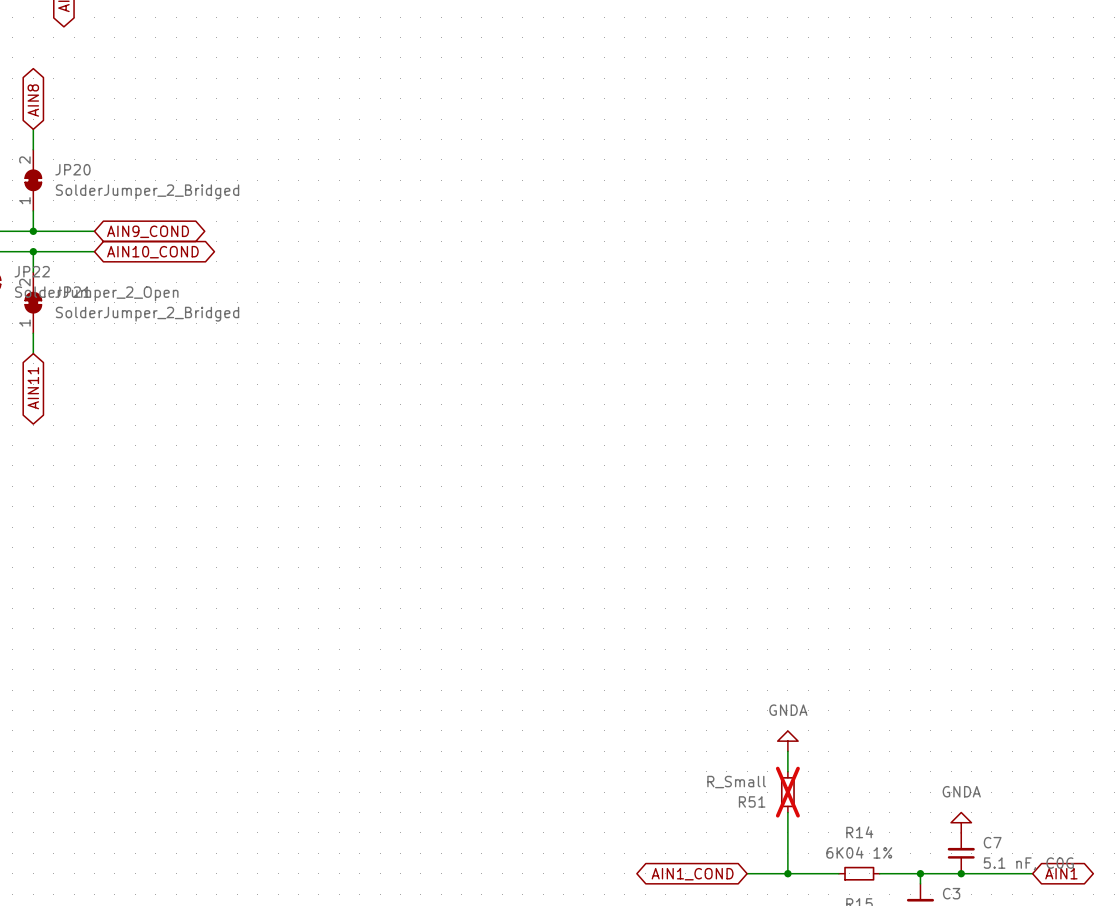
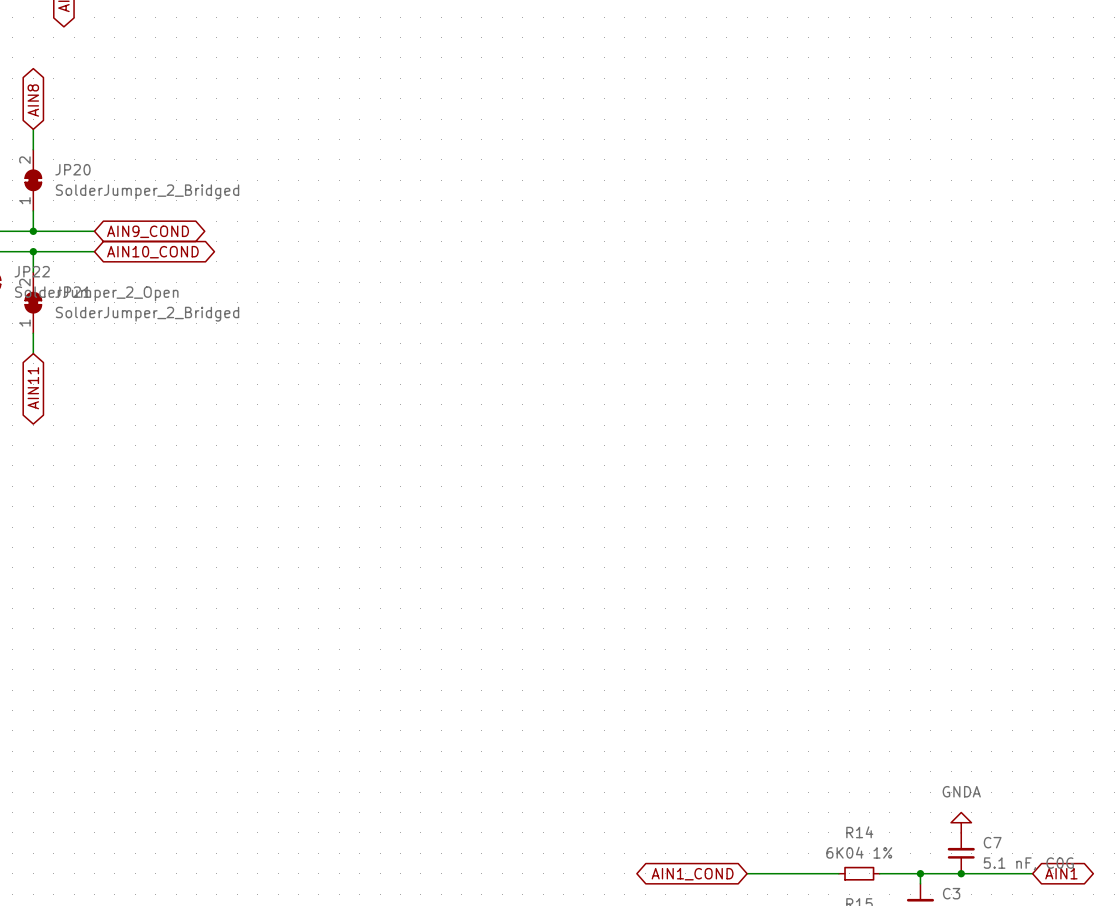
power symbol: GNDA (787, 741) -> none
wire: (787, 751) (787, 771) -> none
R51: R_Small (787, 792) -> none
wire: (787, 812) (787, 873) -> none
junction: (787, 873) -> none

